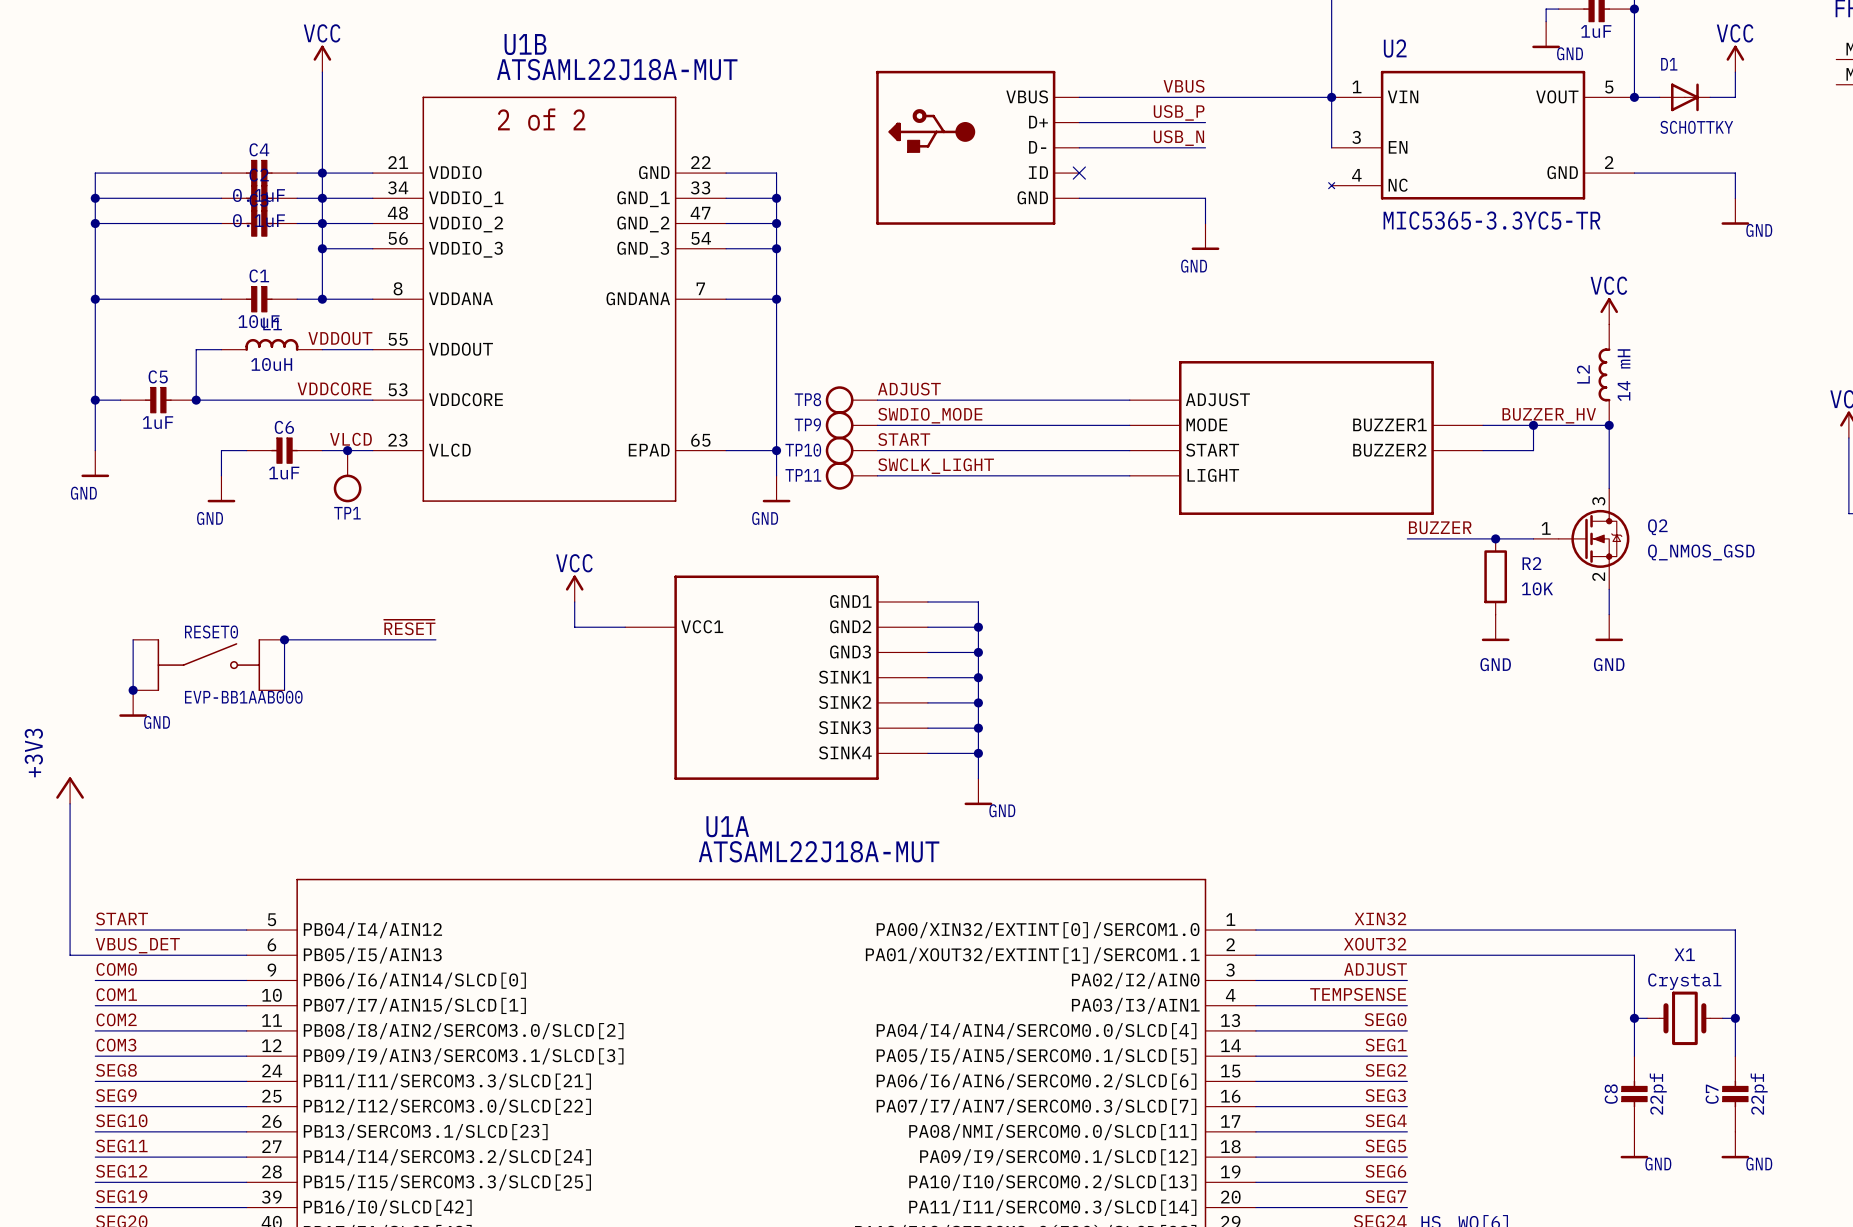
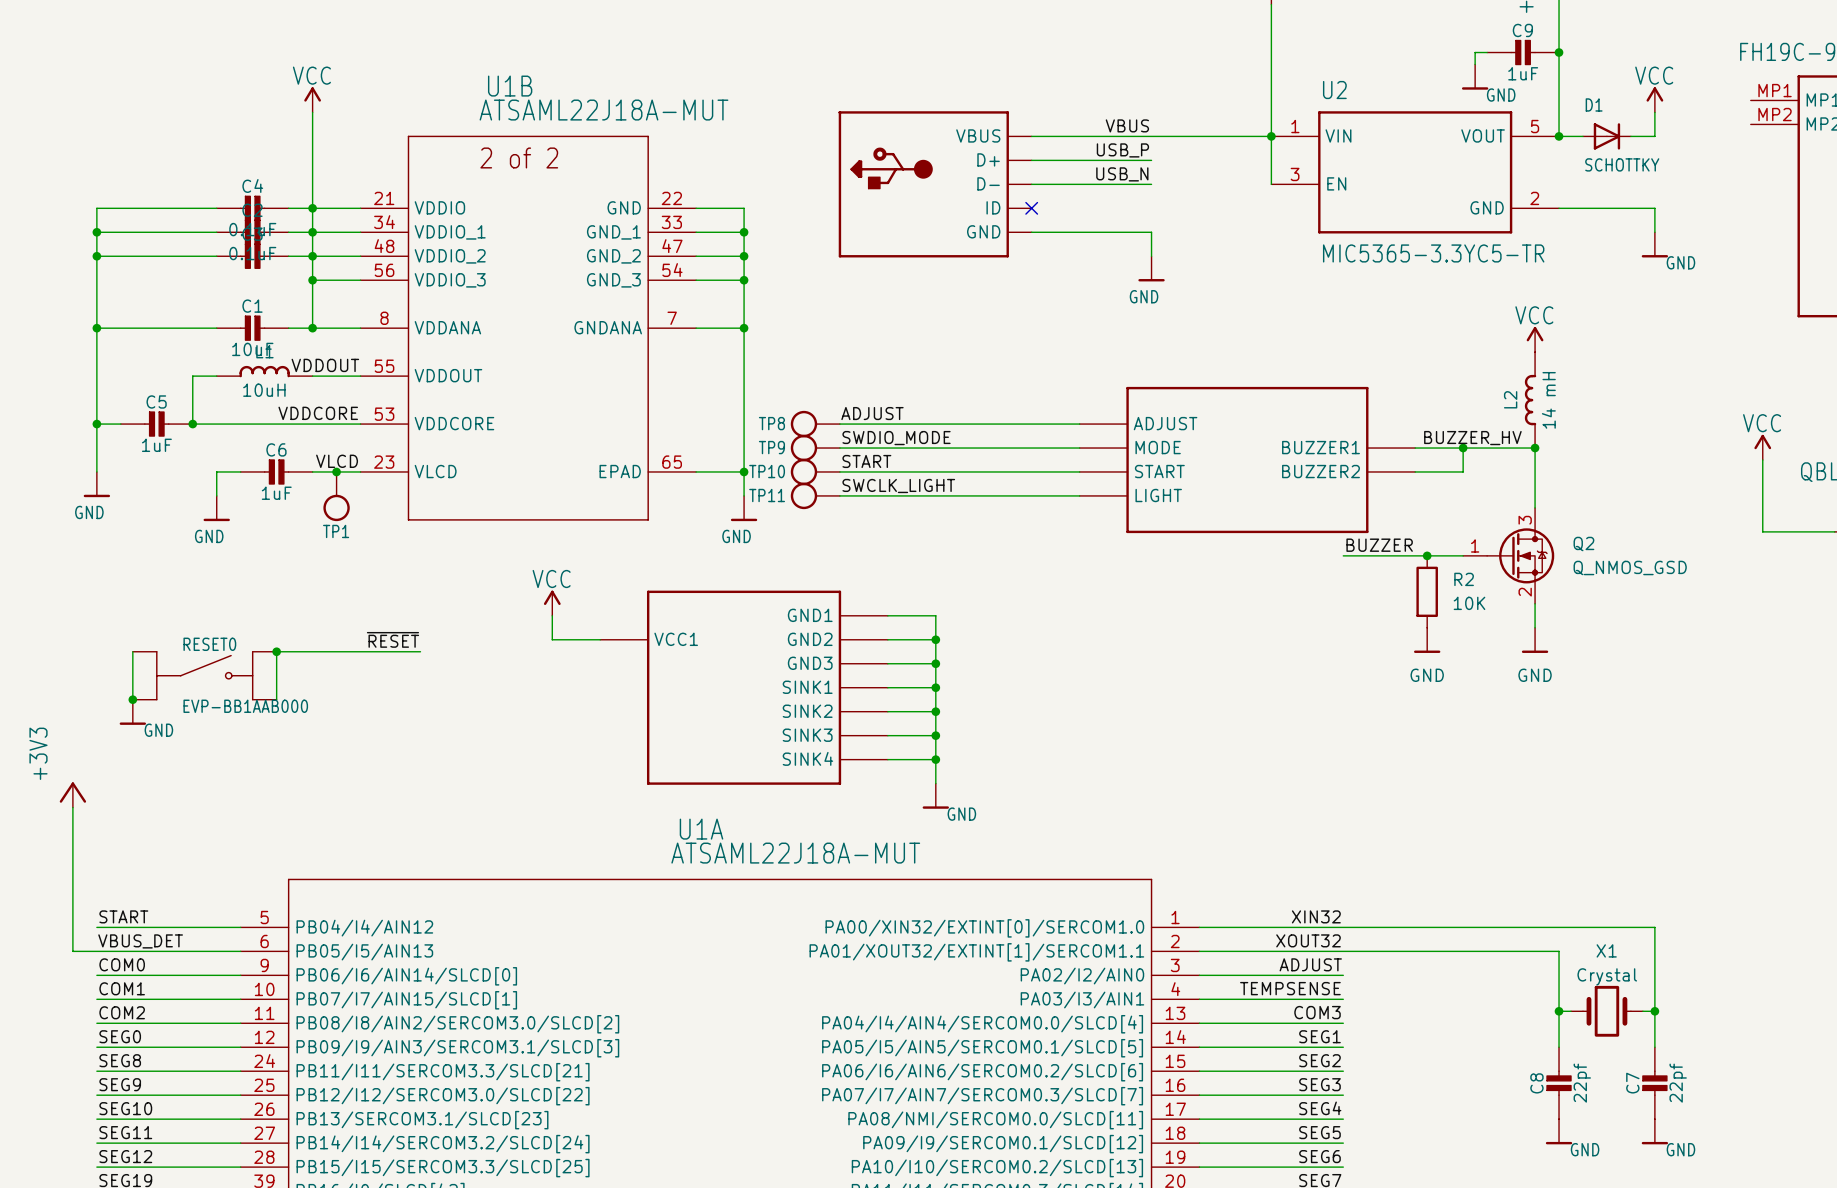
U2 symbol: [1328, 70, 1635, 200] -> [1271, 111, 1560, 234]
label: SEG0 (1385, 1019) -> COM3 (1317, 1012)
label: COM3 (116, 1045) -> SEG0 (120, 1036)

